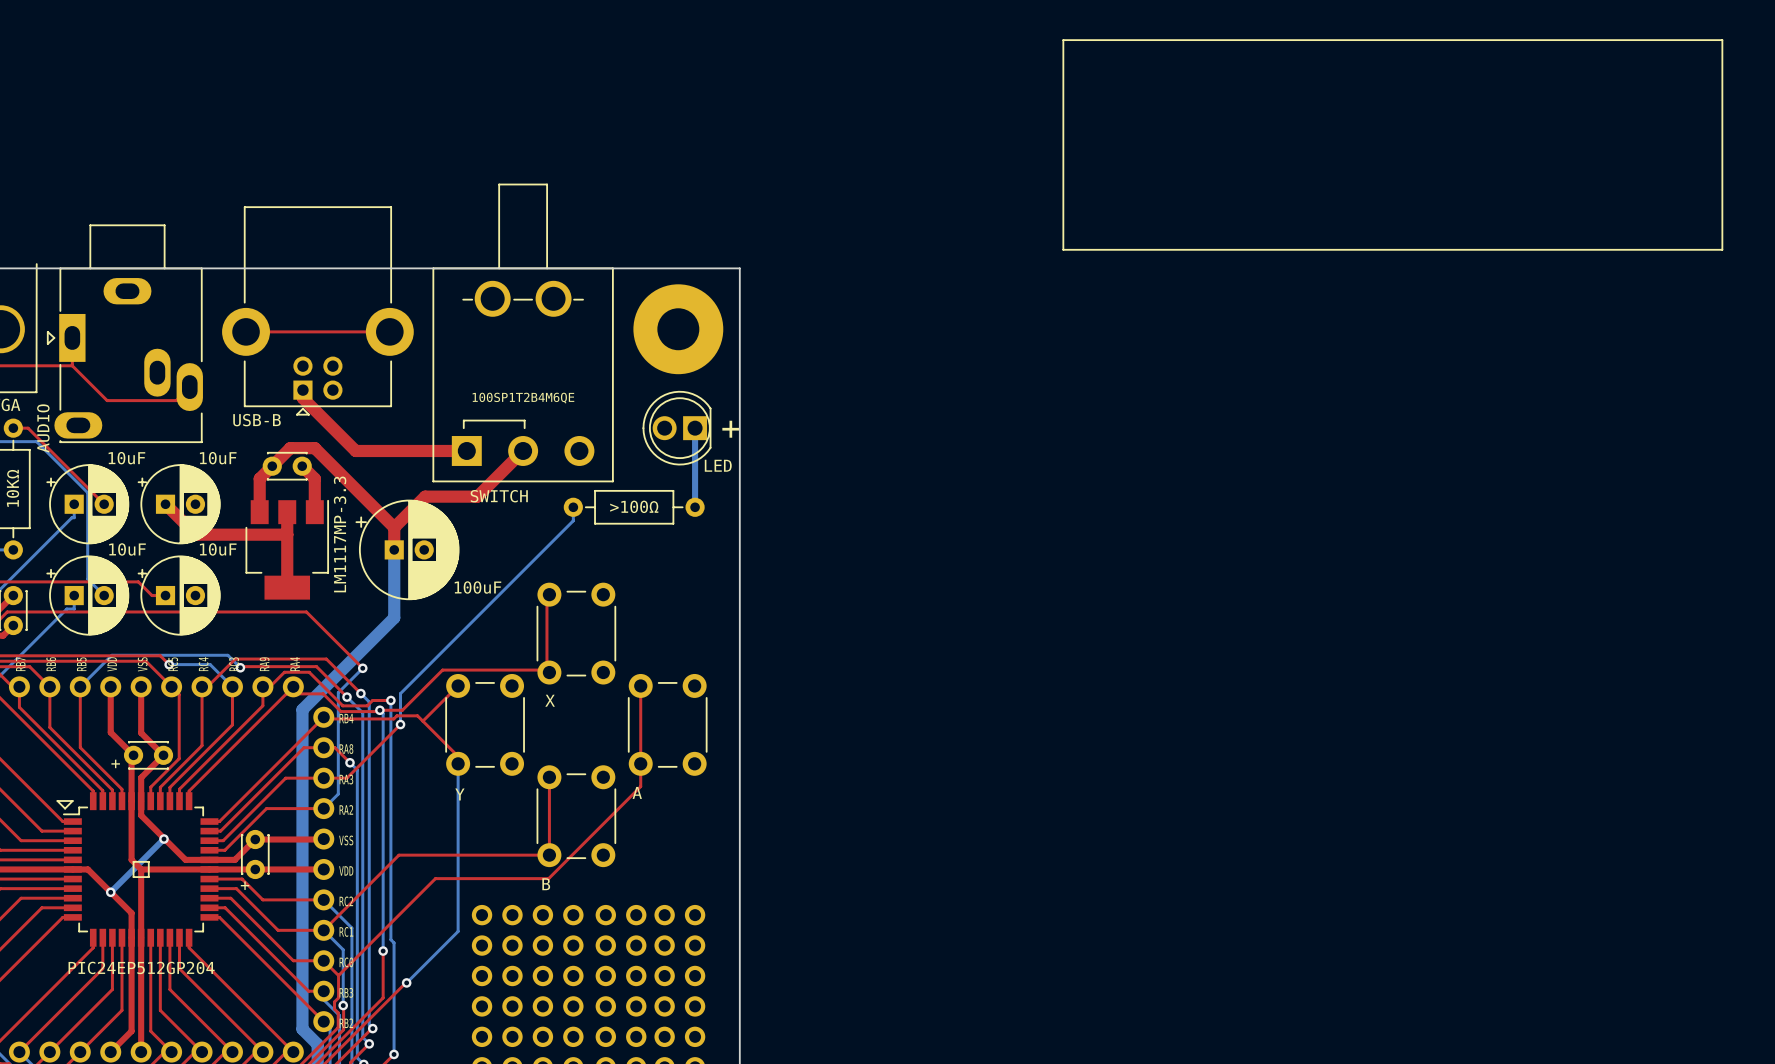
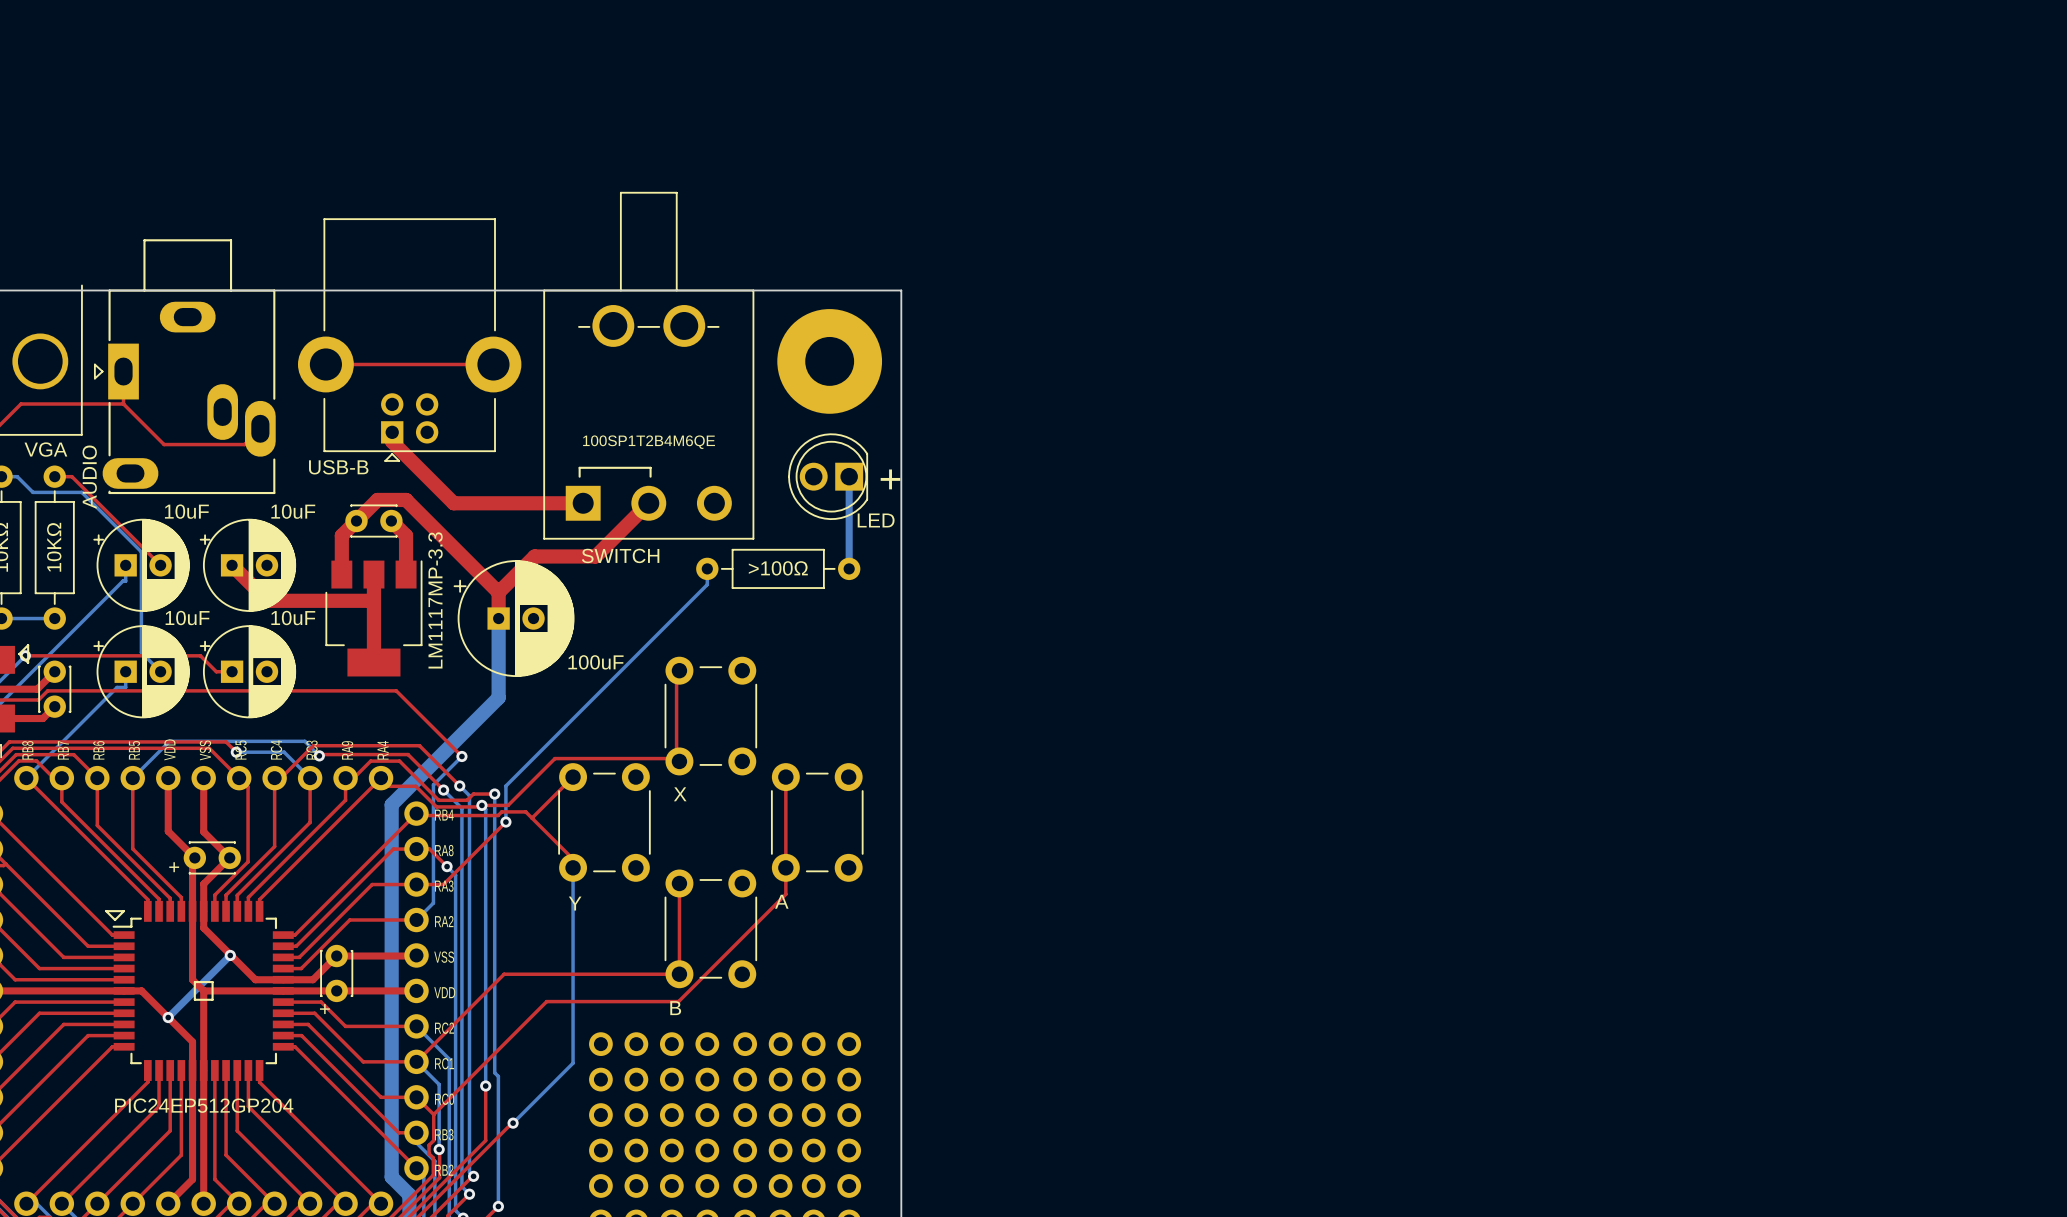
line: (1063, 40) (1722, 40) (1722, 249) (1063, 249) (1063, 40) -> none

